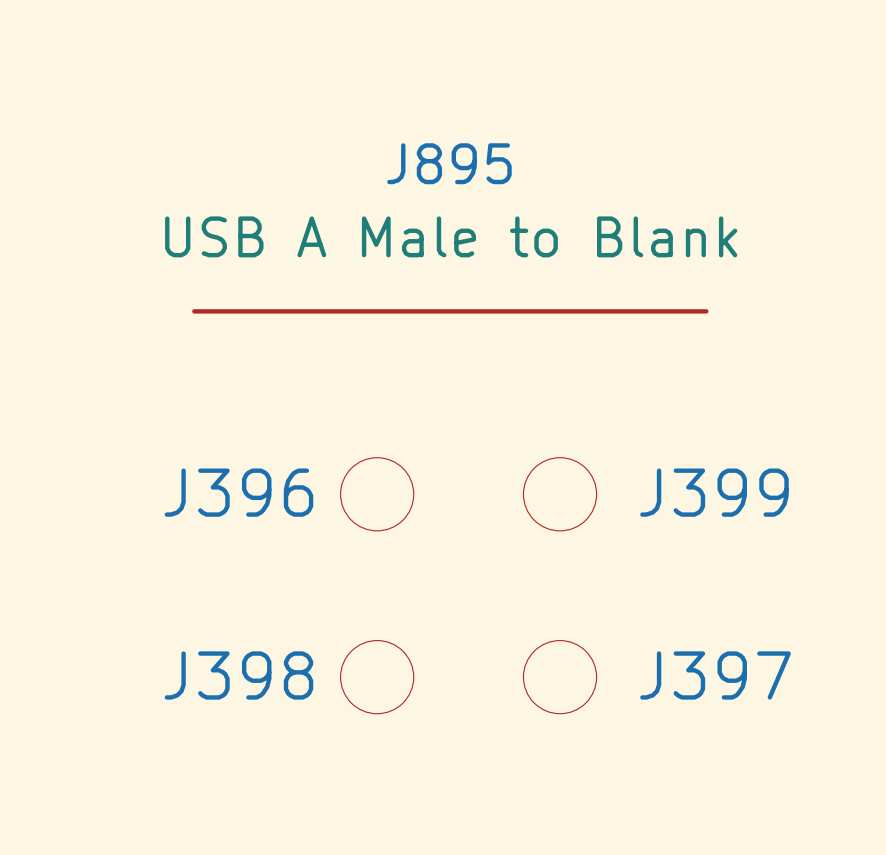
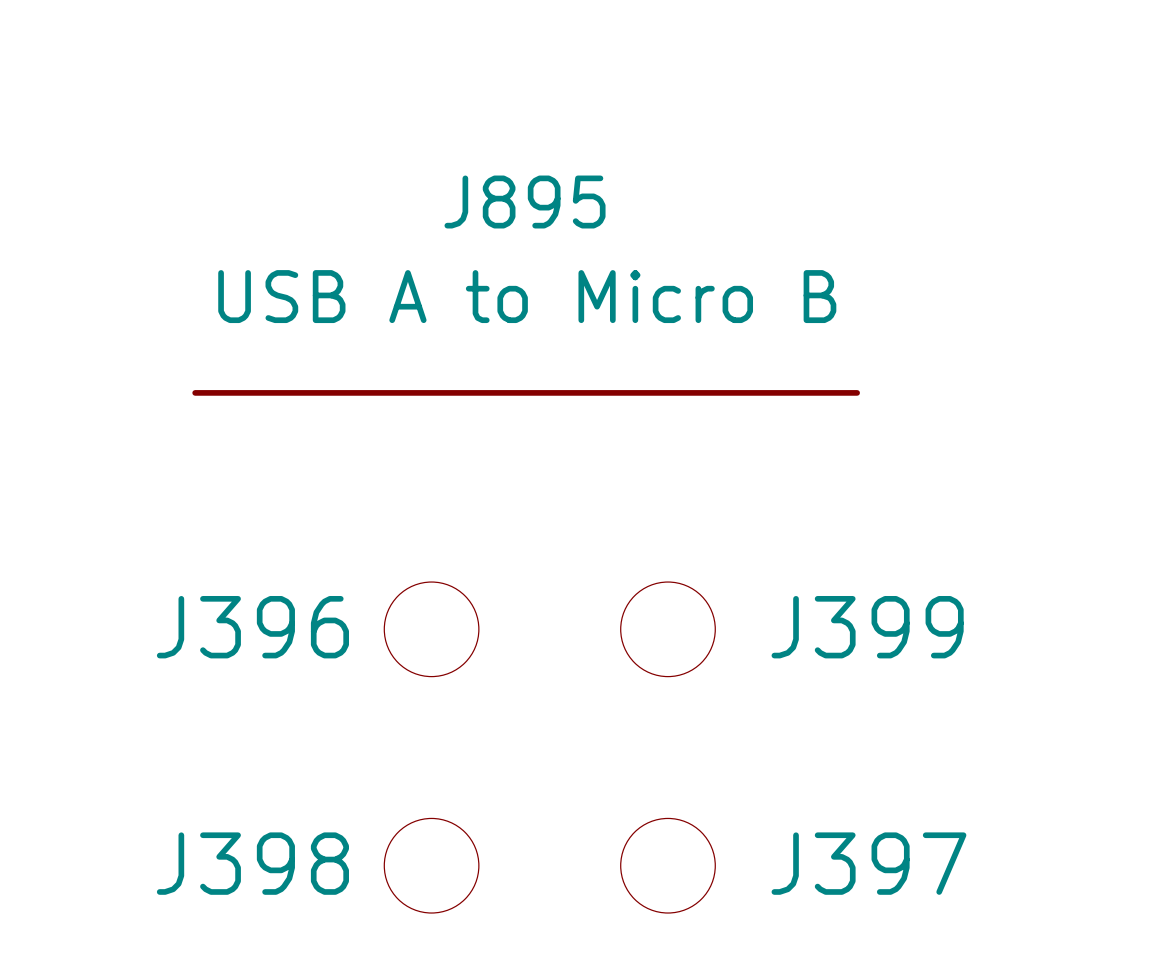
J895 value: USB A Male to Blank (451, 236) -> USB A to Micro B (527, 296)

